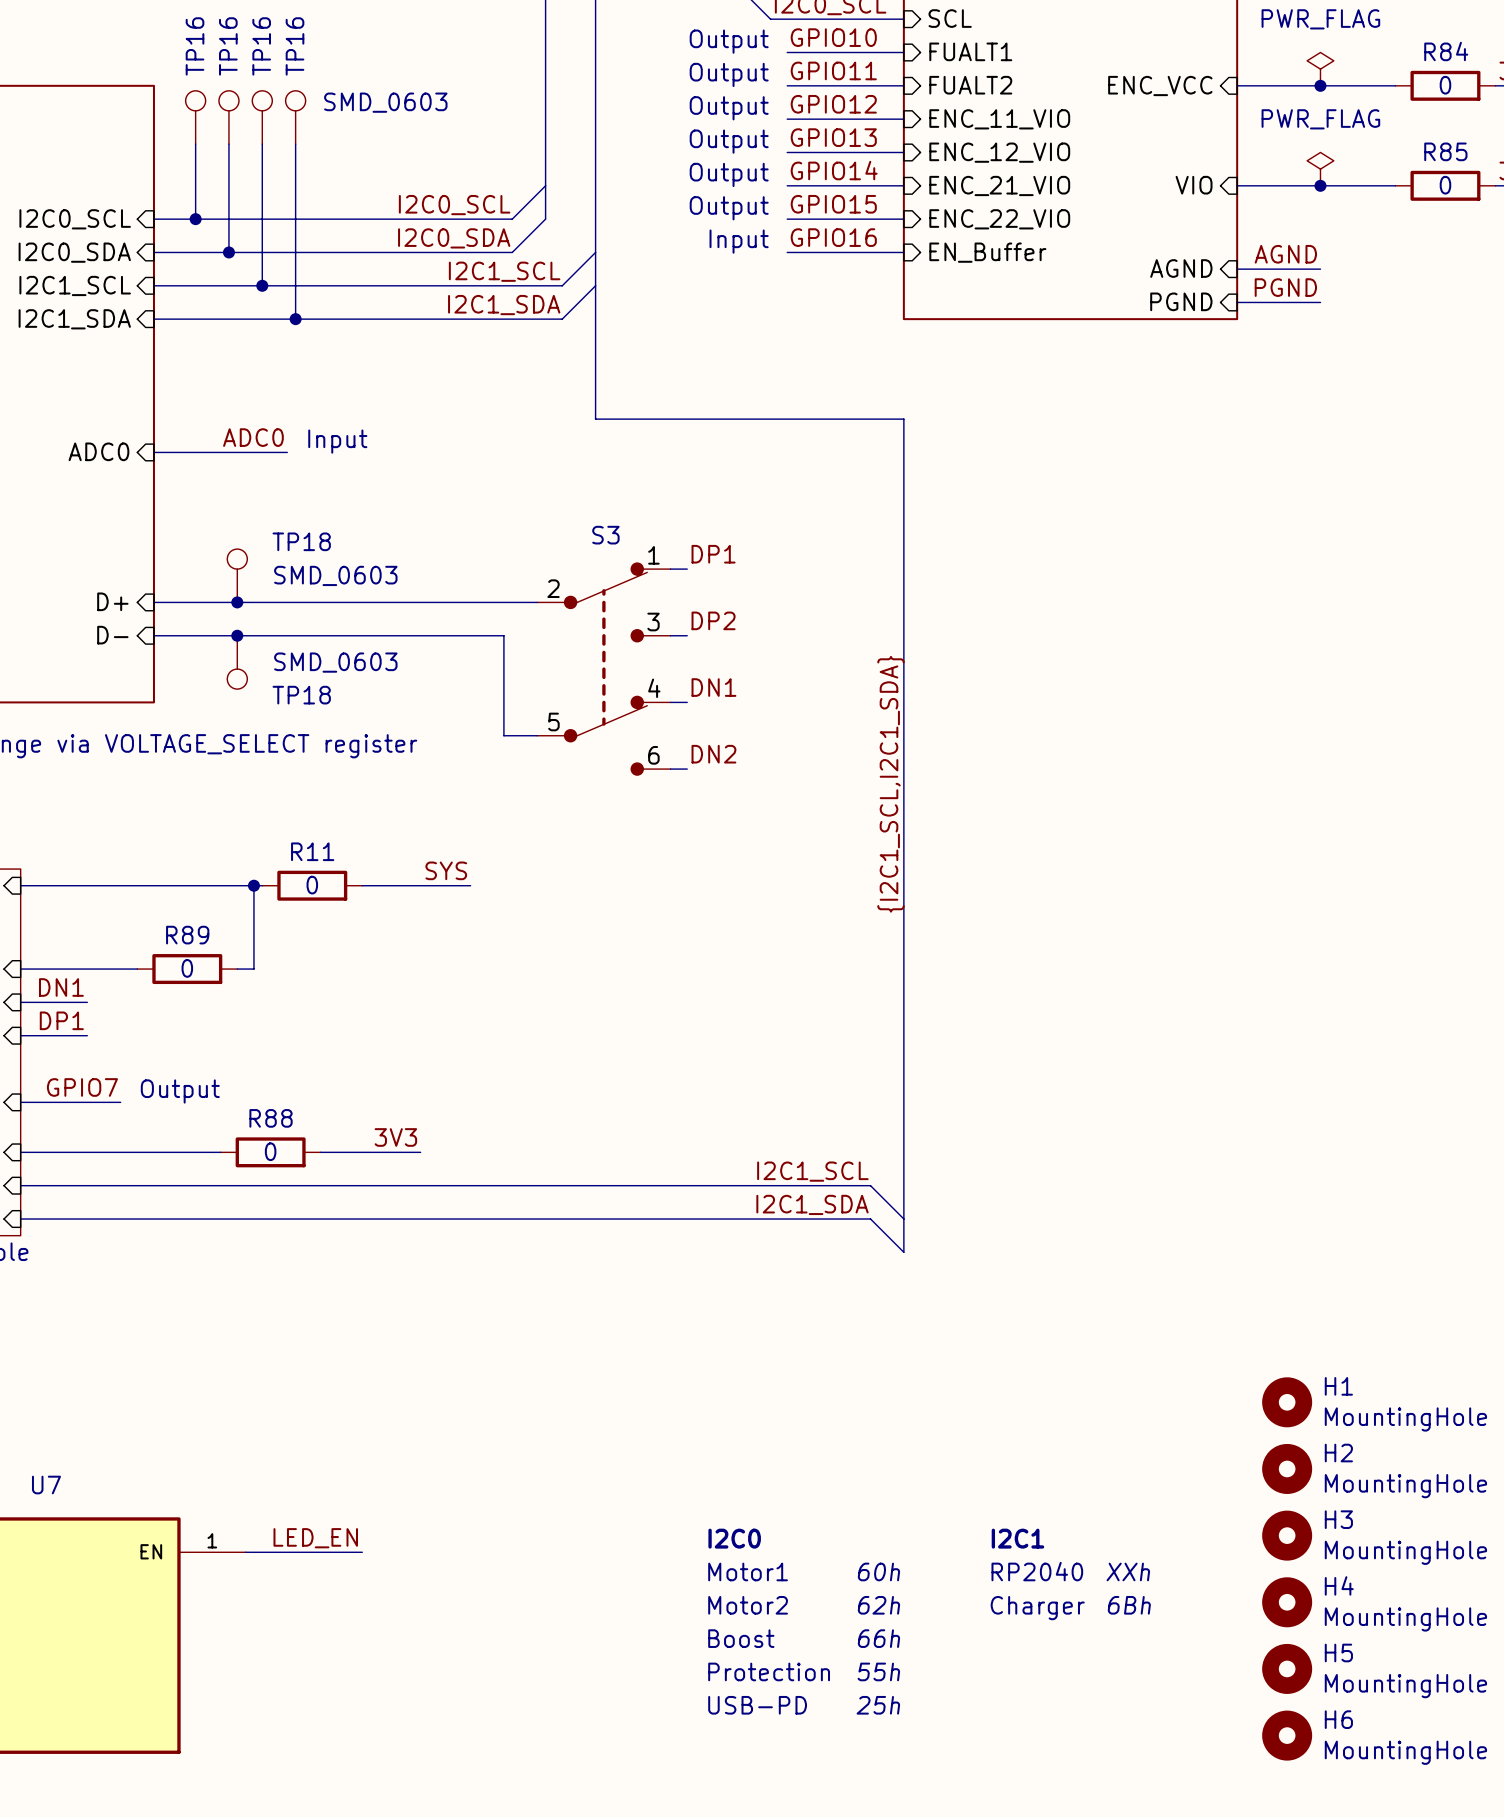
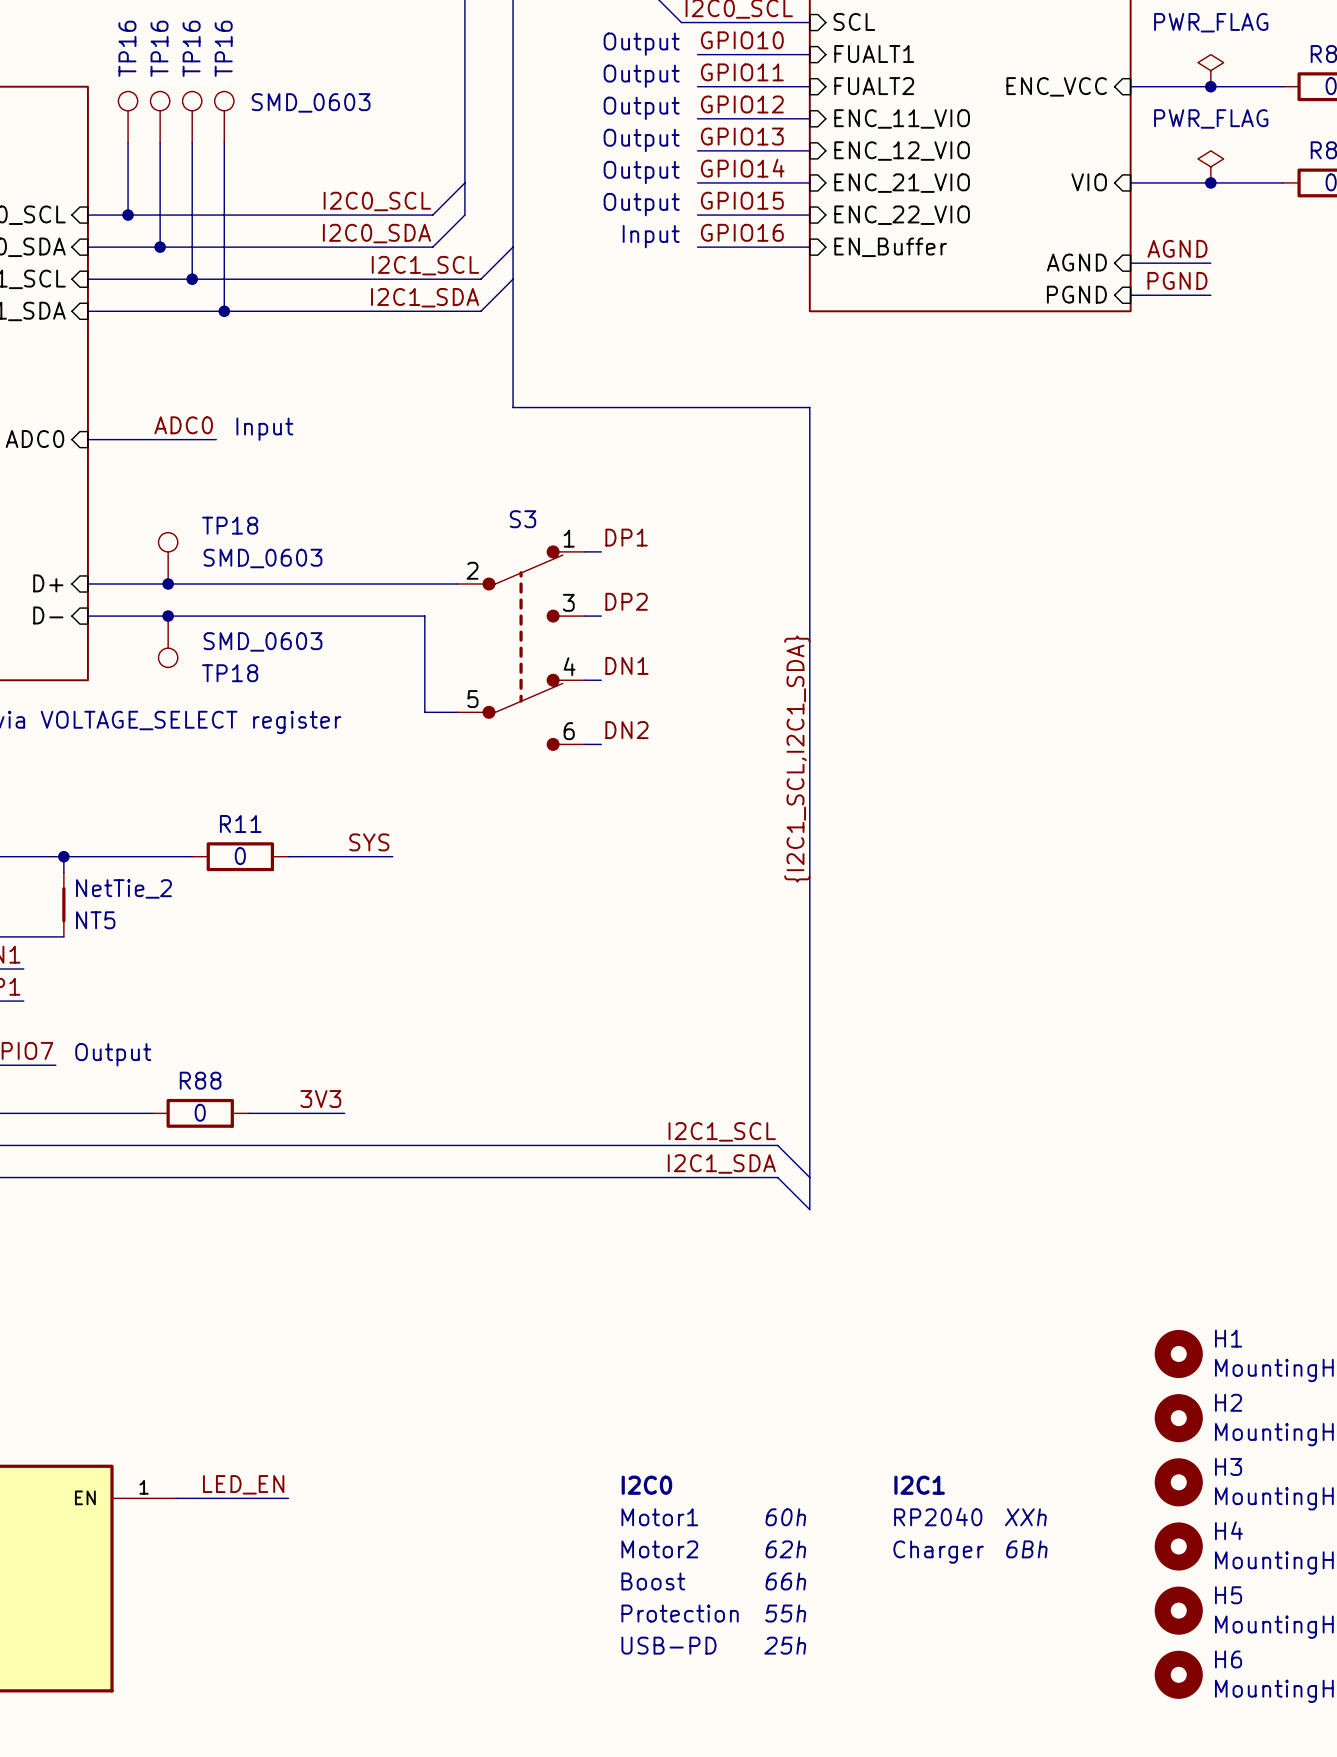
wire: none -> (63, 856) (63, 872)
junction: none -> (63, 856)
wire: (253, 885) (253, 969) (237, 969) -> none
junction: (253, 885) -> none
NT5: none -> NetTie_2 (63, 904)
wire: (128, 969) (137, 969) -> none
R89: 0 (187, 969) -> none

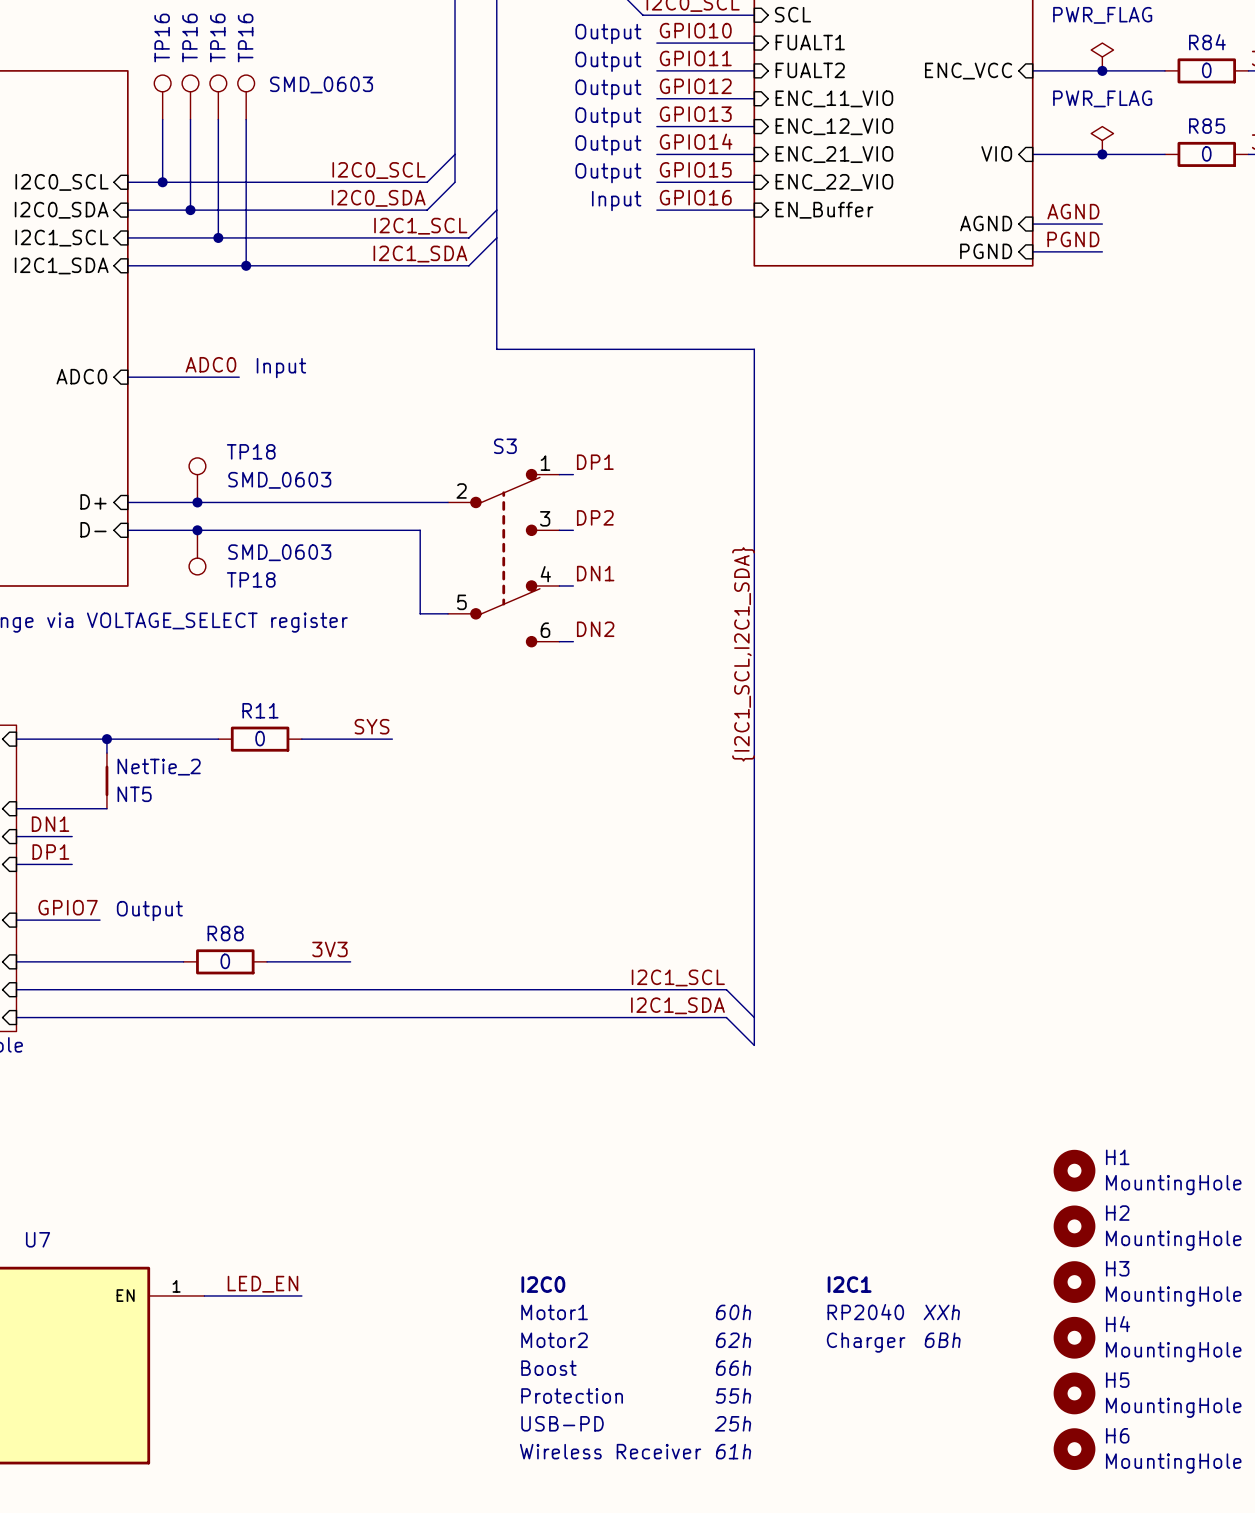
text position: I2C0 (646, 1485) -> I2C0 (543, 1284)
text position: Motor1 (659, 1517) -> Motor1 (554, 1312)
text position: Motor2 (659, 1549) -> Motor2 (554, 1340)
text position: Boost (653, 1581) -> Boost (548, 1368)
text position: Protection (680, 1613) -> Protection (572, 1395)
text position: USB-PD (668, 1645) -> USB-PD (562, 1423)
text: none -> Wireless Receiver (610, 1451)
text: none -> 61h (733, 1451)

